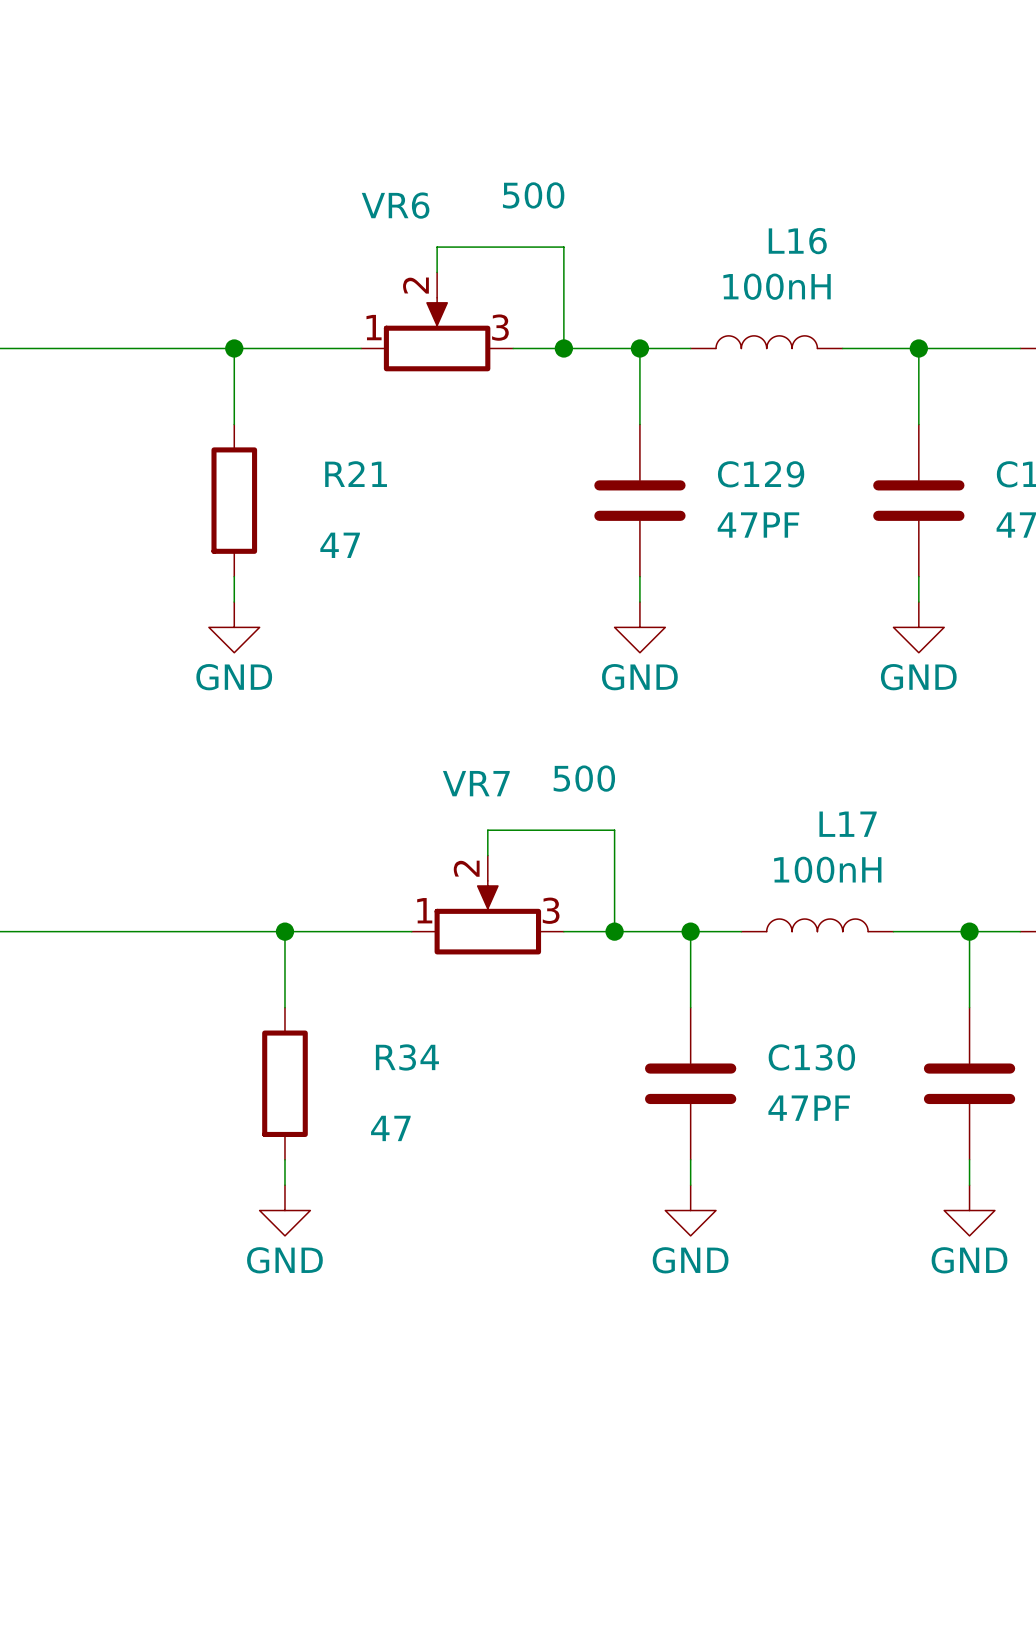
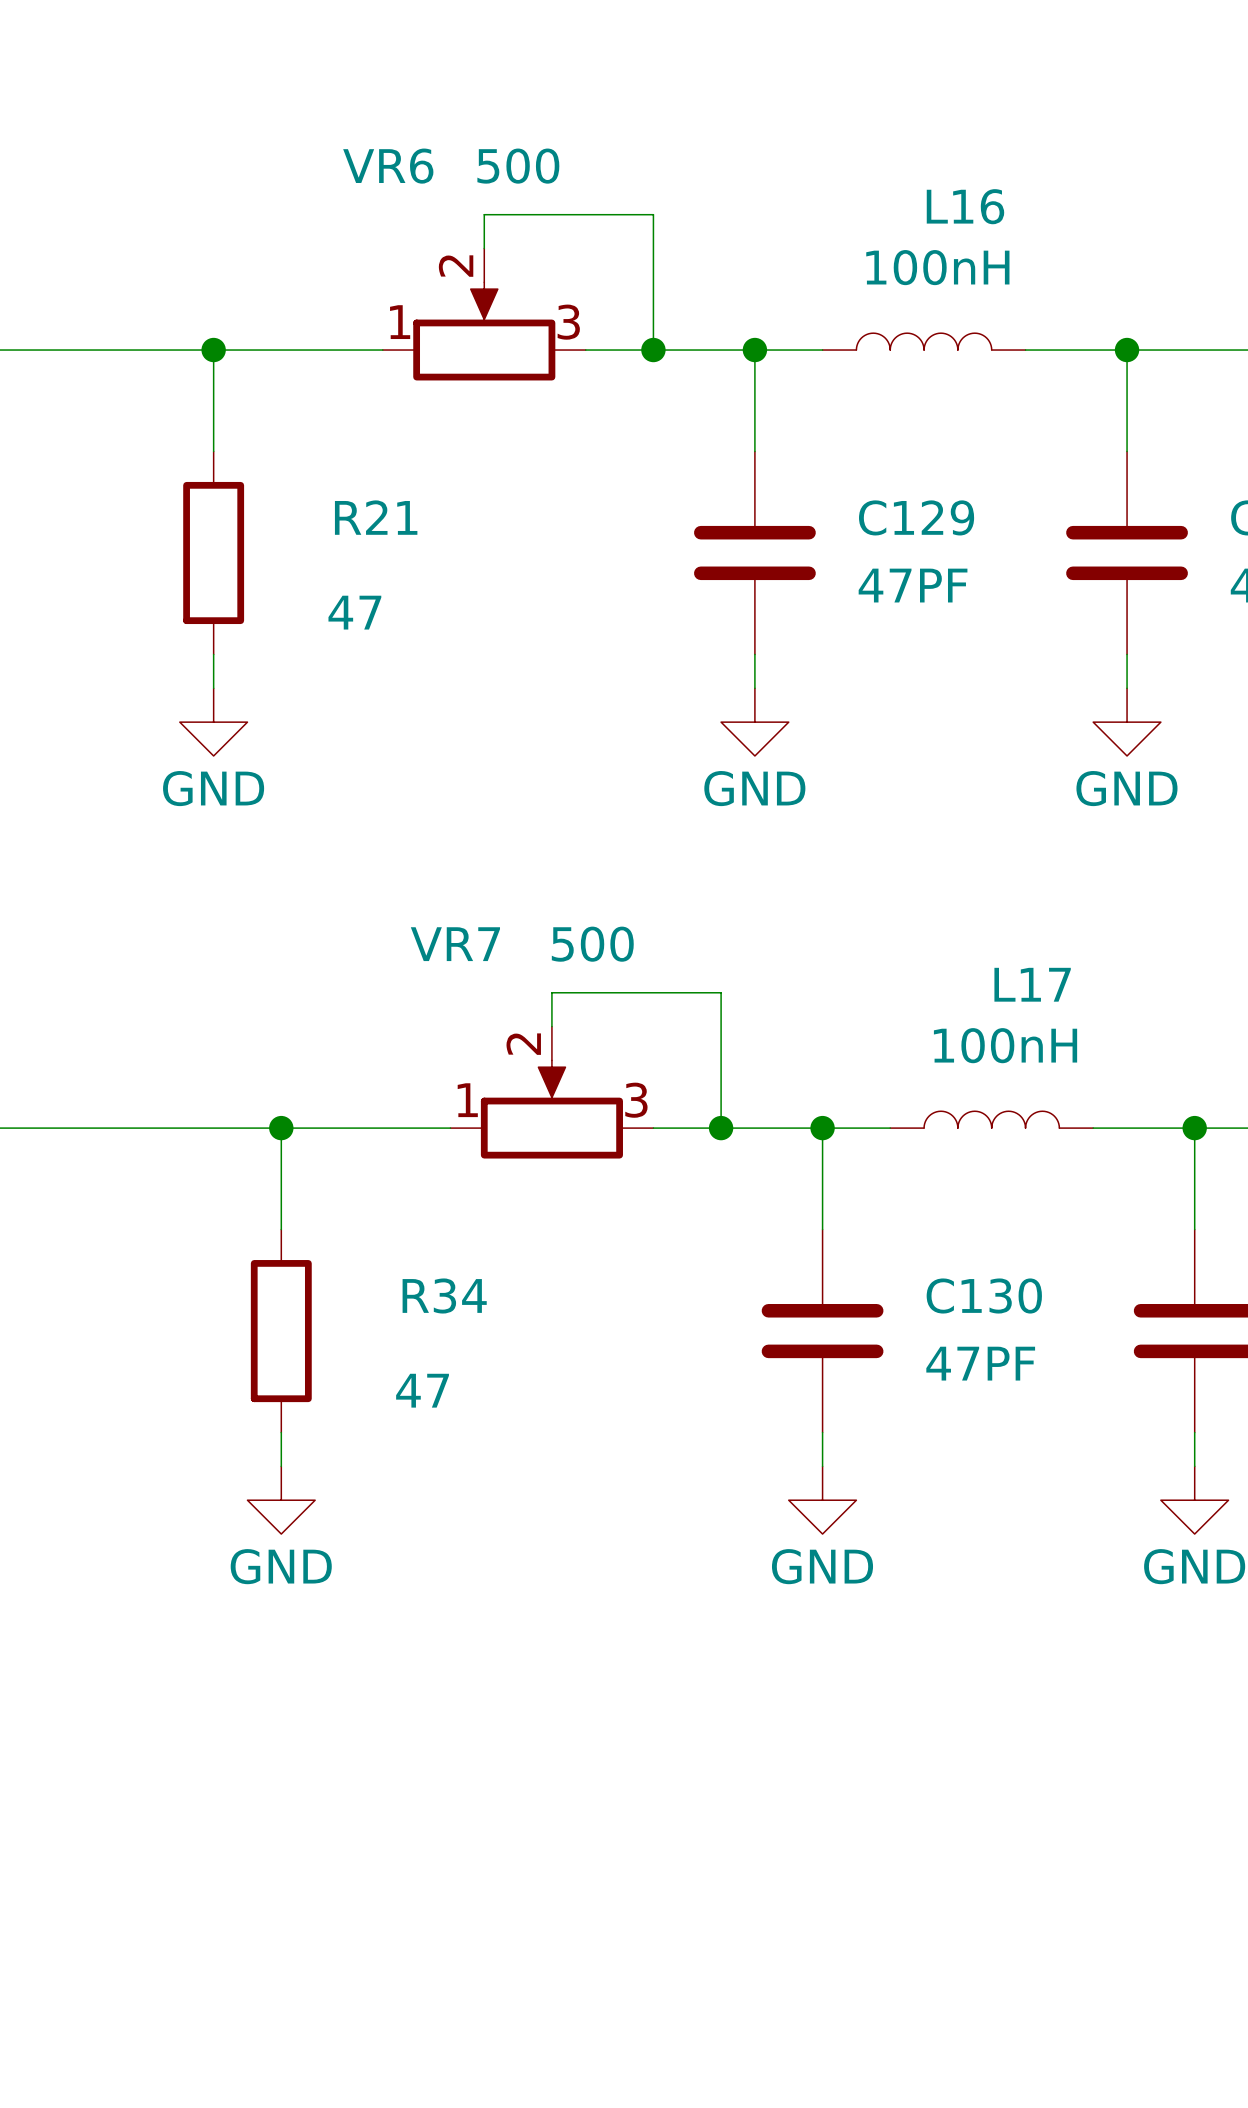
VR6 value position: 500 (533, 195) -> 500 (518, 166)
VR6 name position: VR6 (395, 205) -> VR6 (388, 166)
VR7 value position: 500 (584, 778) -> 500 (592, 944)
VR7 name position: VR7 (476, 783) -> VR7 (455, 944)

